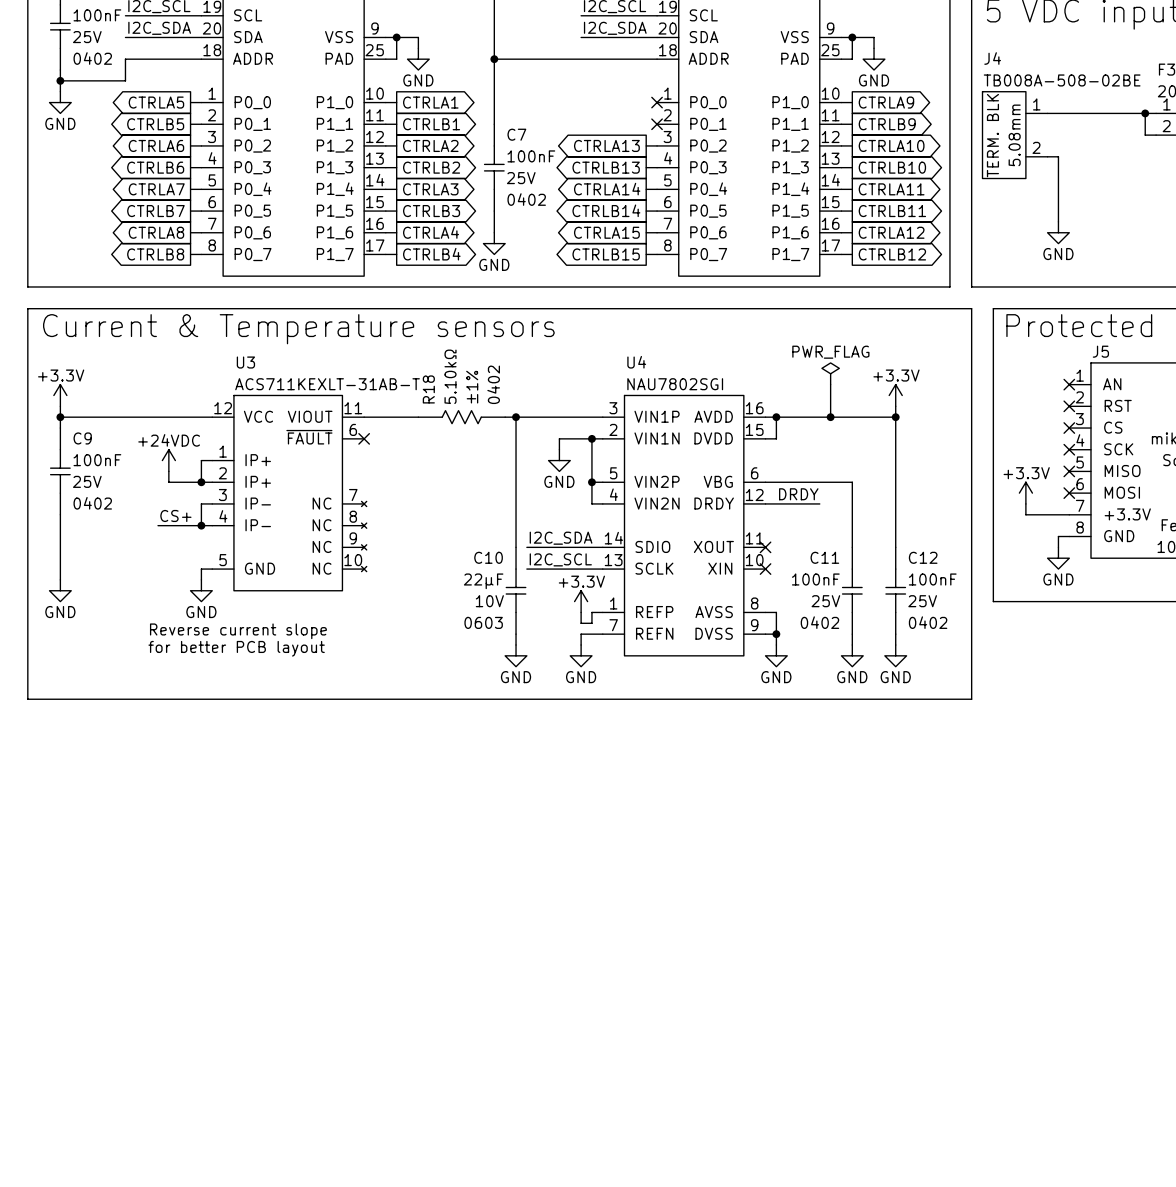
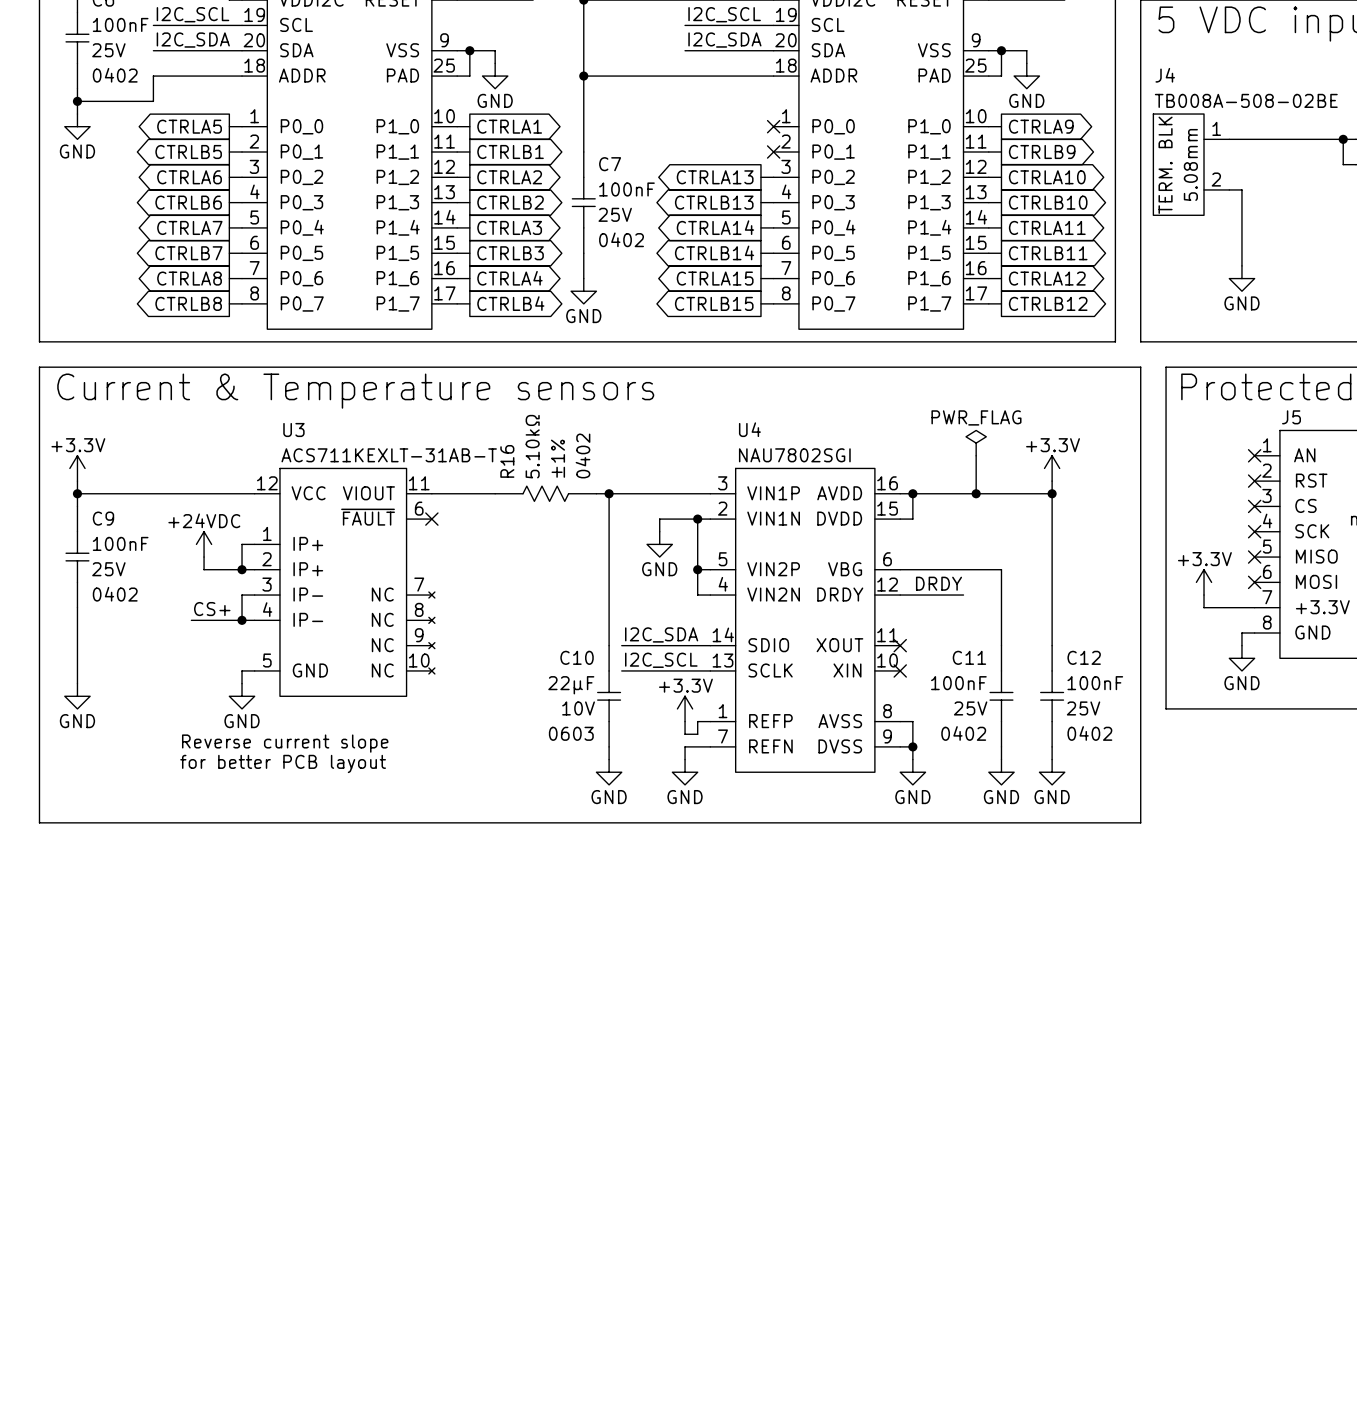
R18 name: R18 (428, 389) -> R16 (507, 461)

